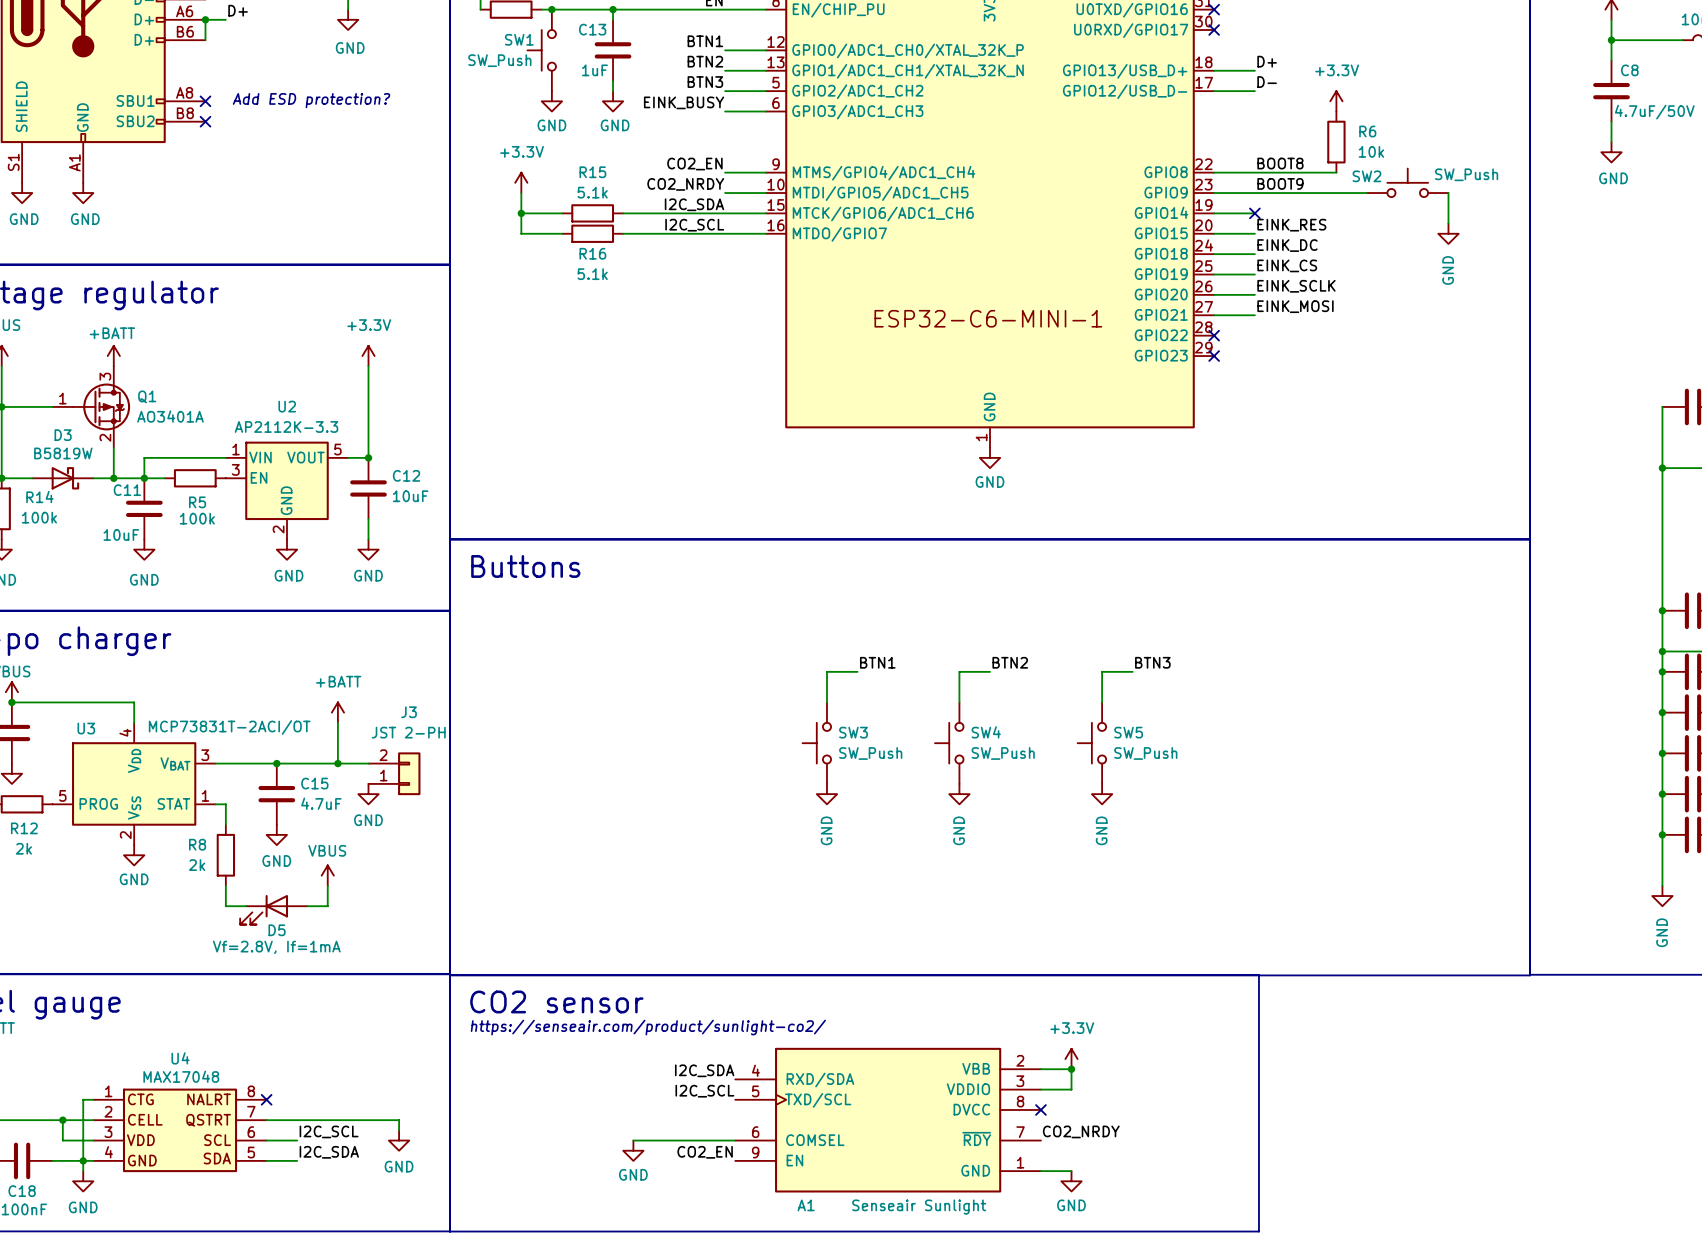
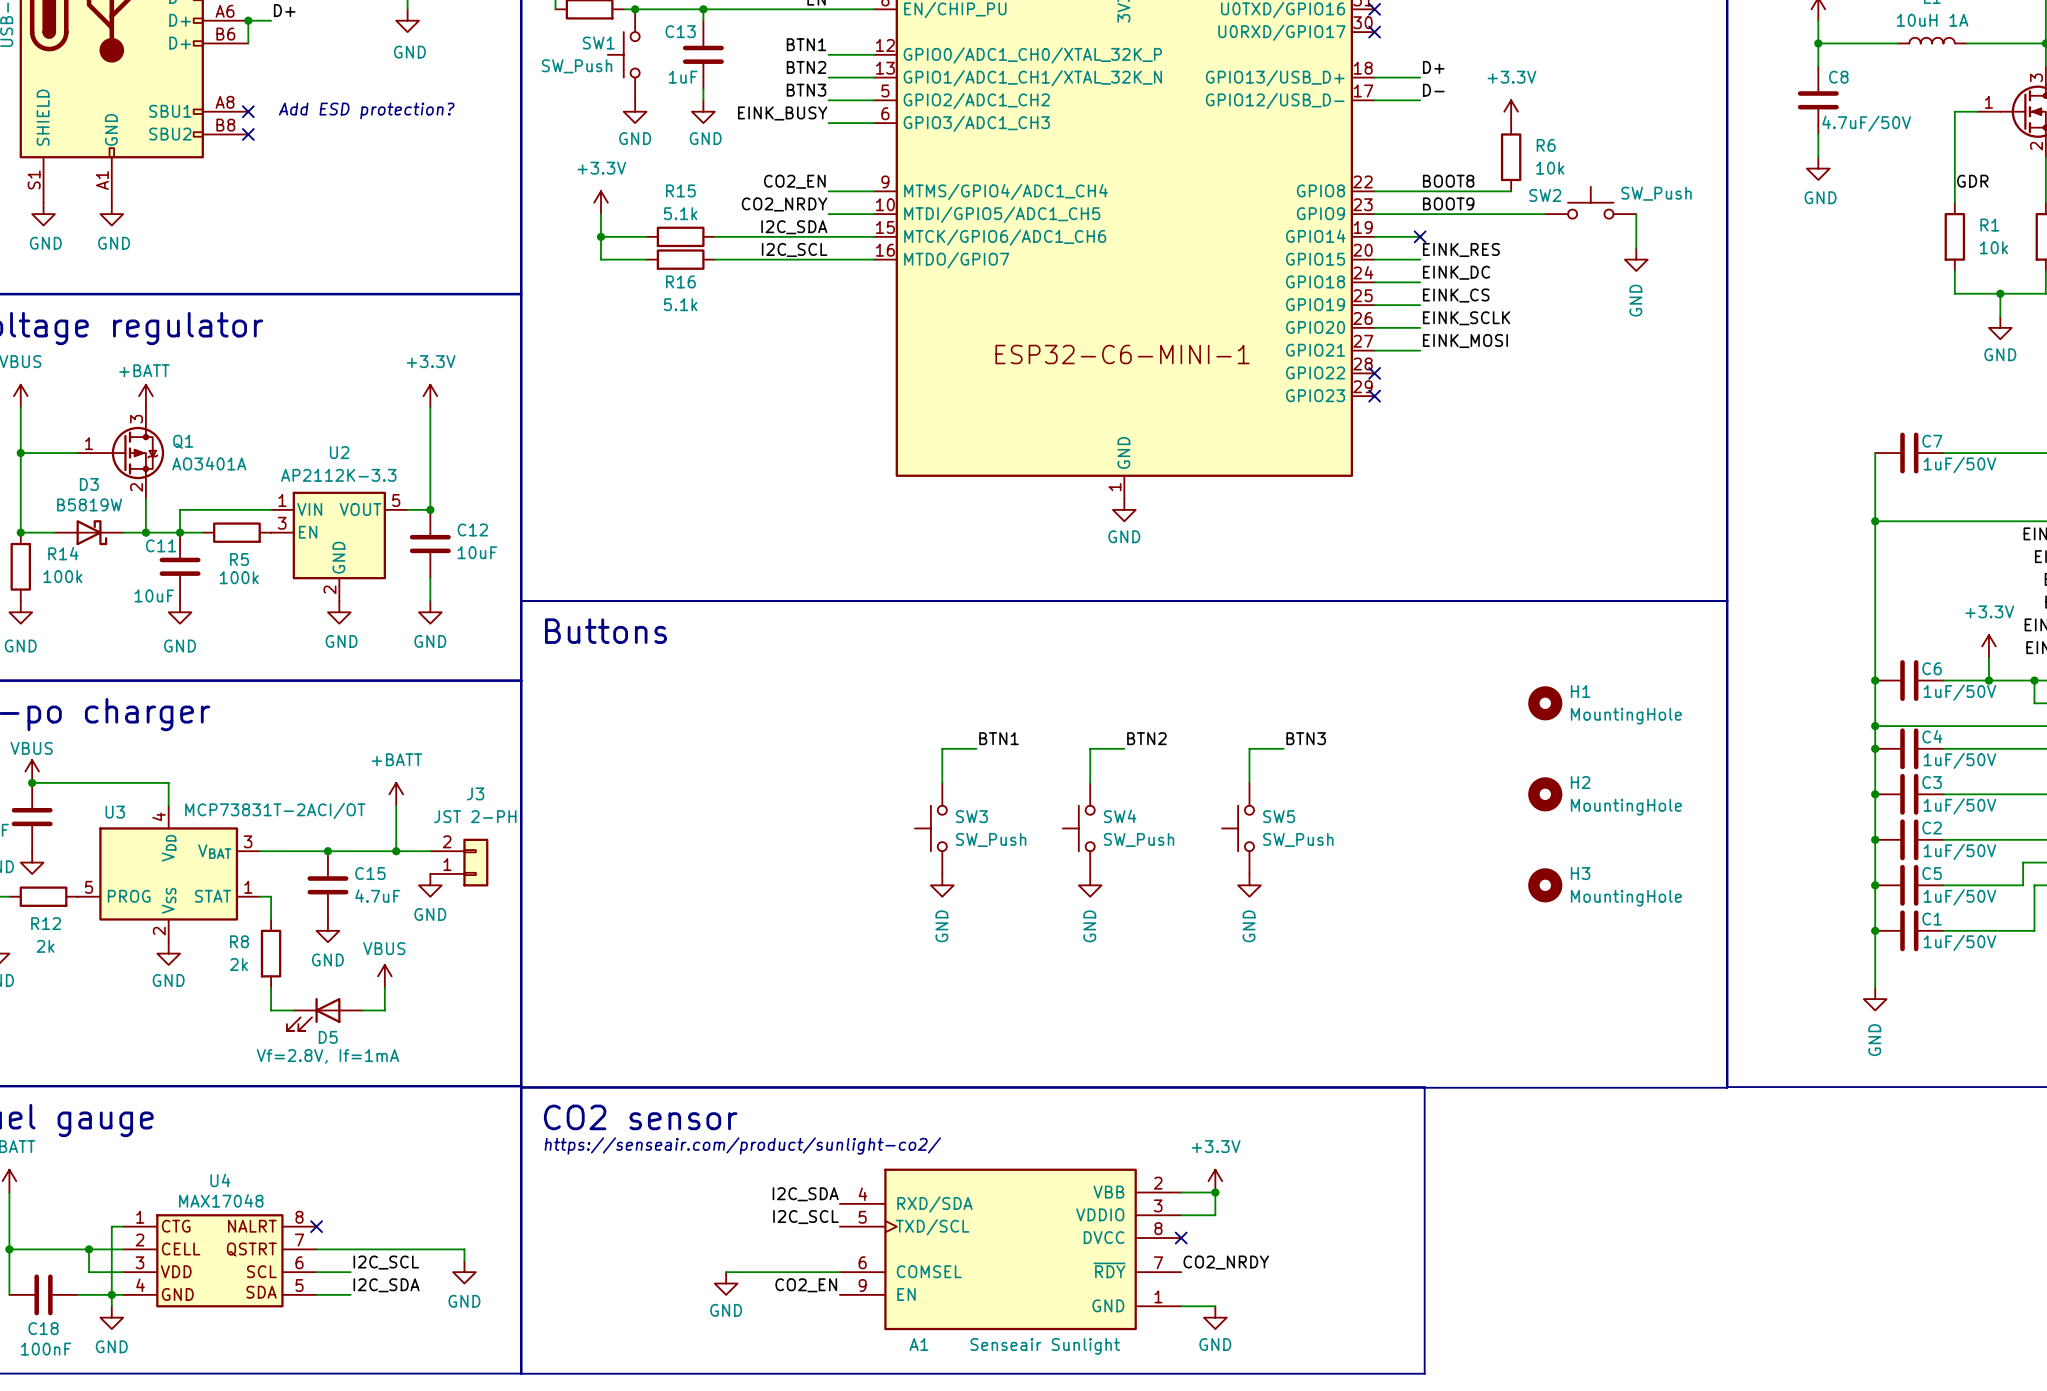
H1: none -> MountingHole (1545, 703)
H2: none -> MountingHole (1545, 794)
H3: none -> MountingHole (1545, 885)

